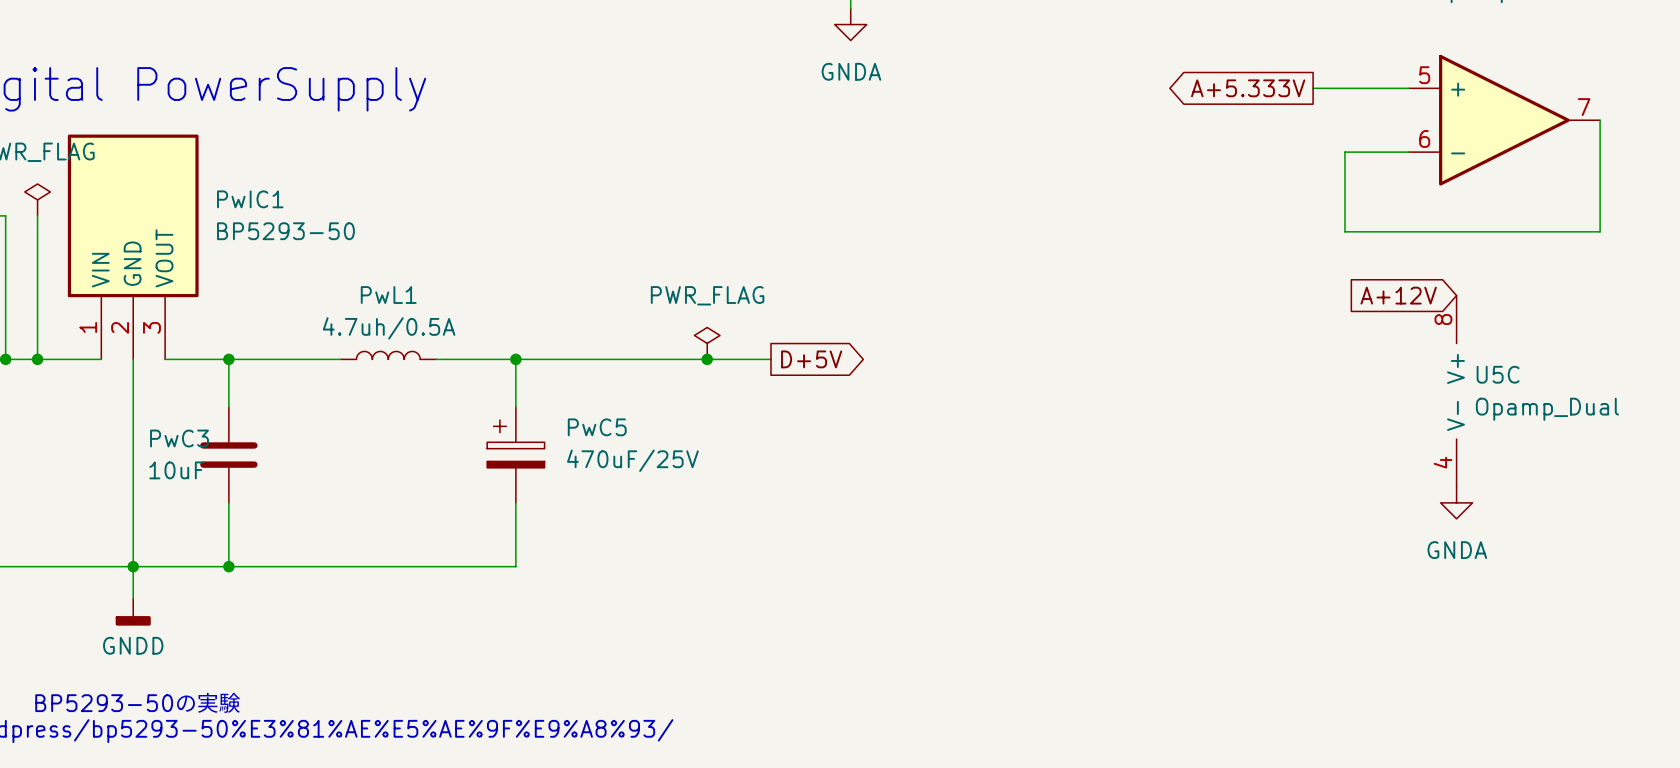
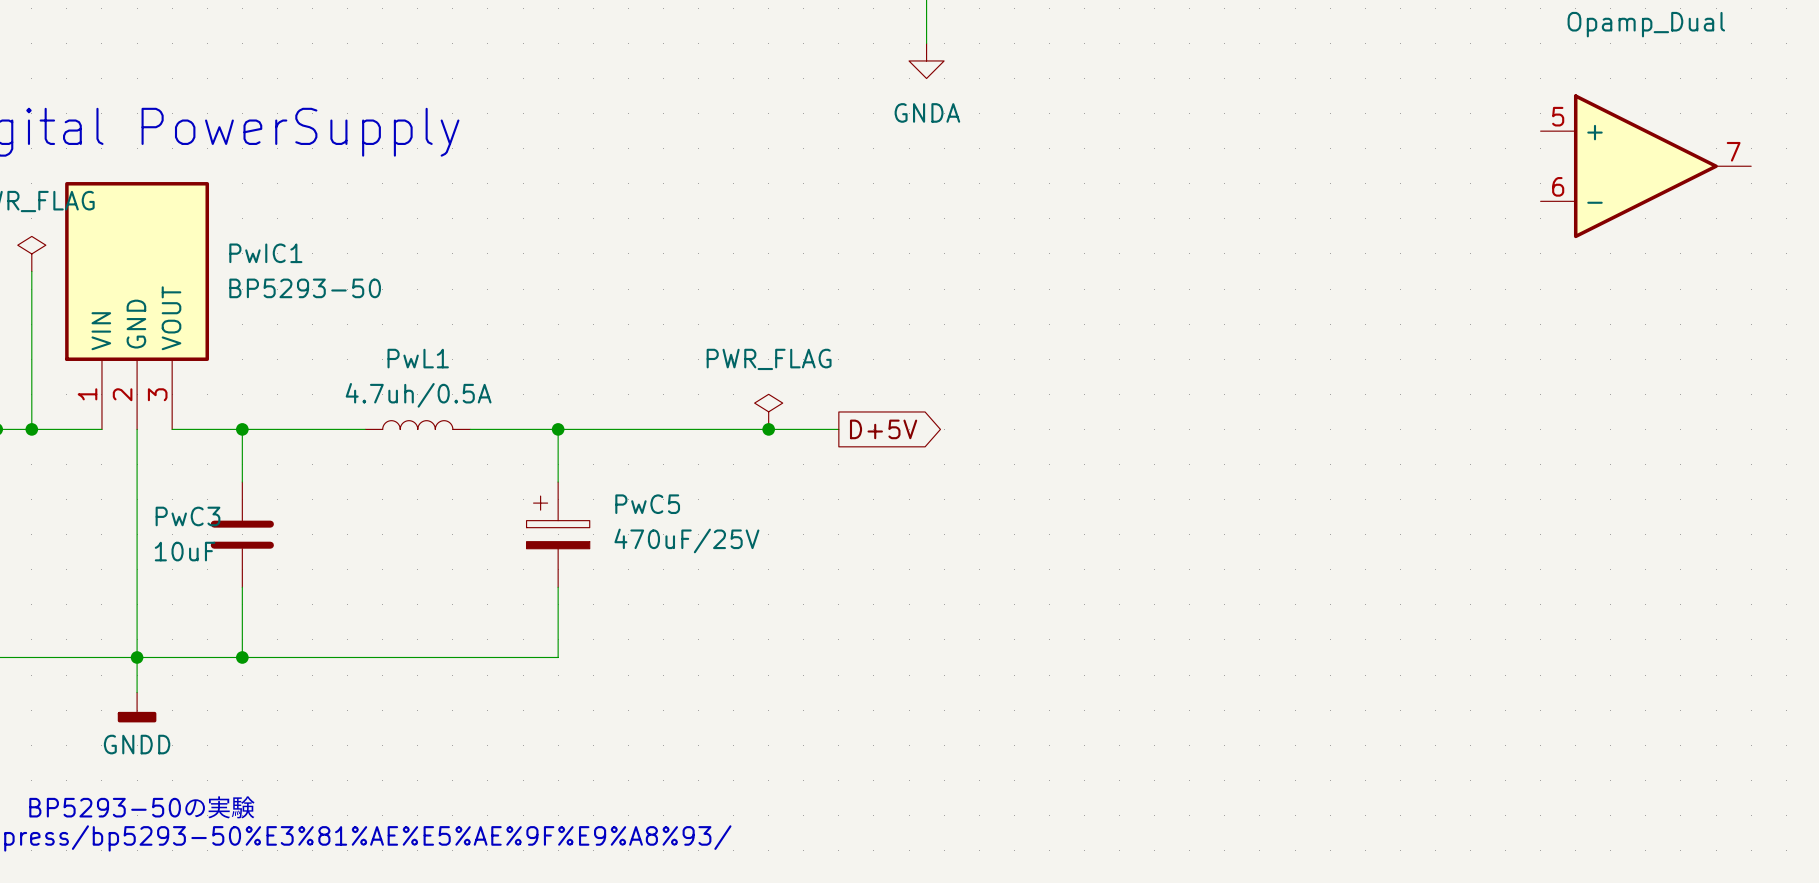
global label: A+5.333V (1248, 88) -> none
wire: (1313, 88) (1408, 88) -> none
wire: (1600, 120) (1600, 231) (1344, 231) (1344, 152) (1408, 152) -> none
global label: A+12V (1398, 295) -> none
U5C: Opamp_Dual (1456, 391) -> none
power symbol: GNDA (1456, 502) -> none

